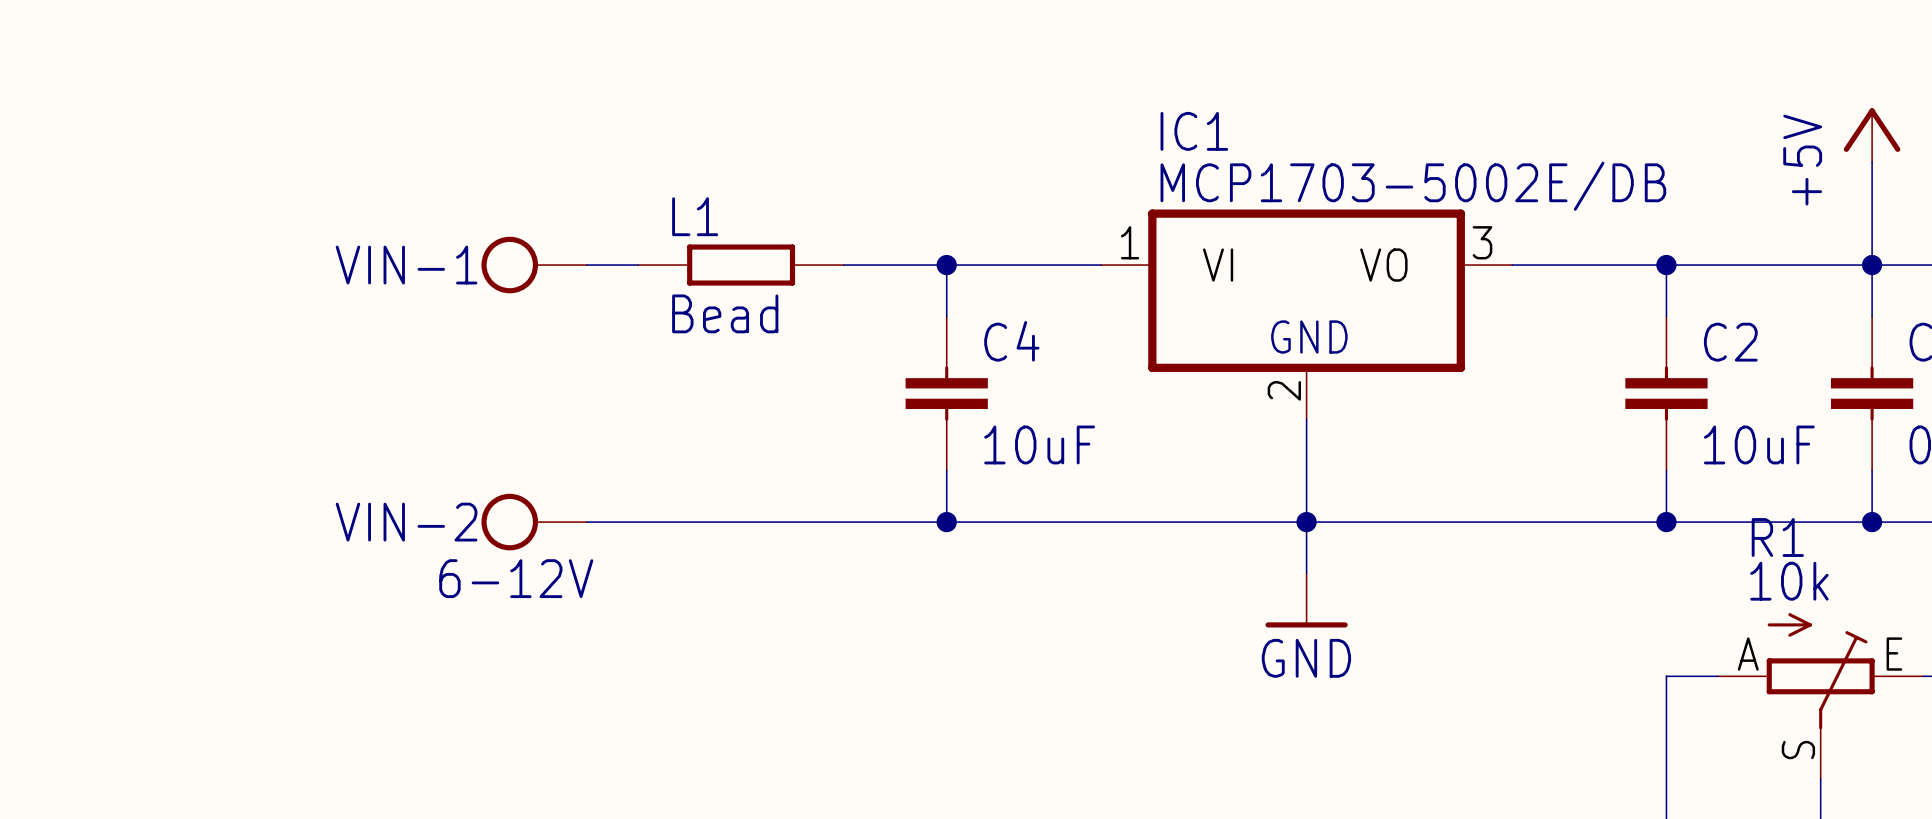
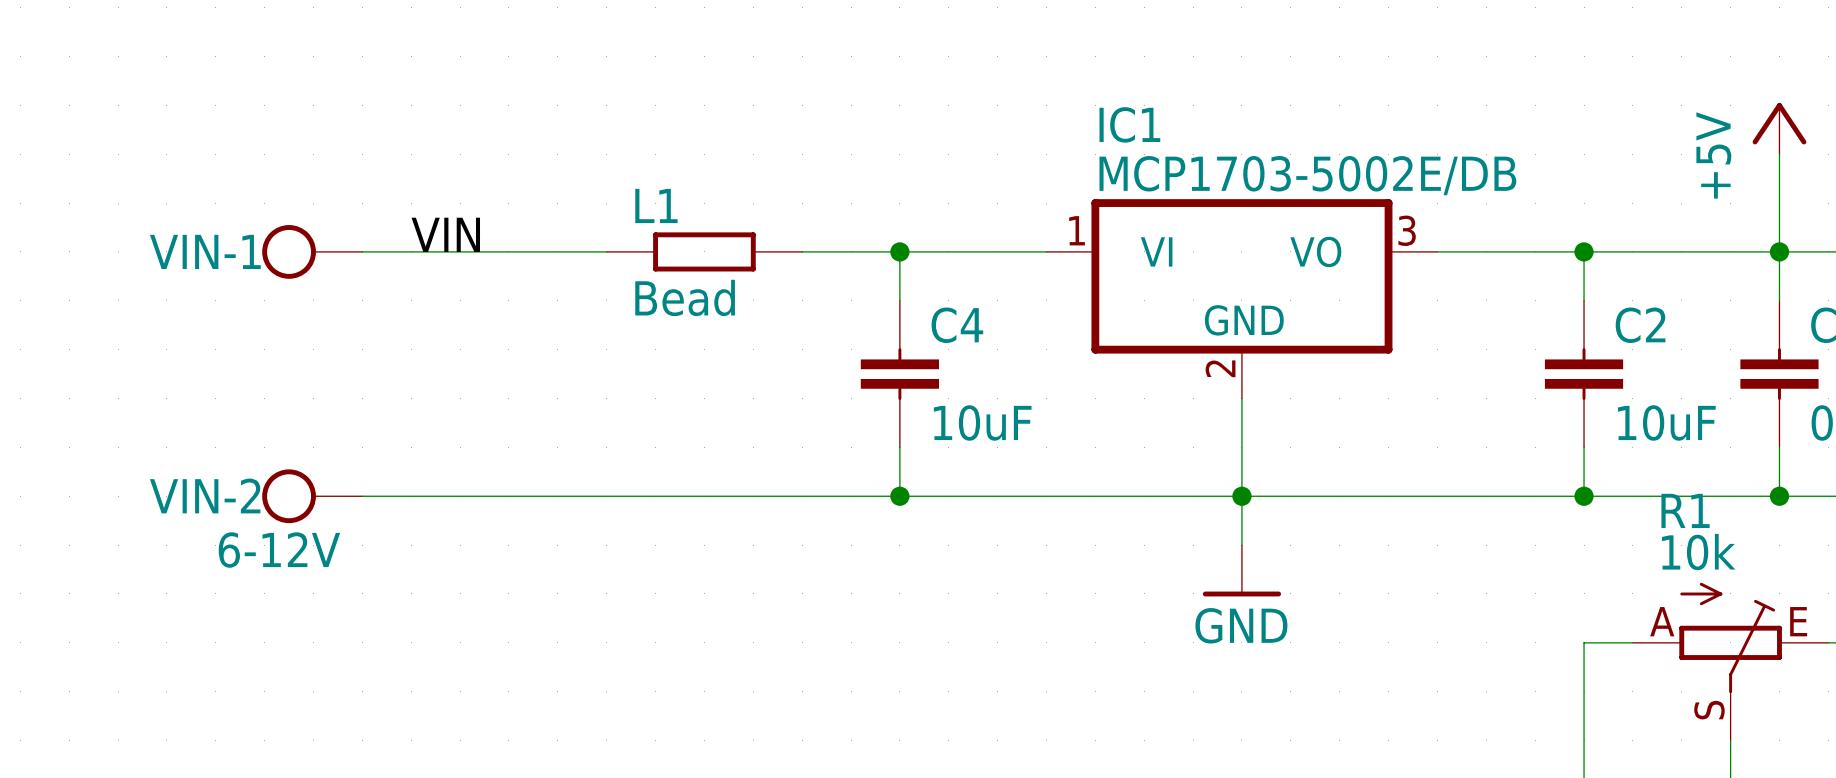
label: none -> VIN (445, 234)
wire: none -> (362, 251) (557, 251)
VIN-1 position: (534, 265) -> (312, 251)
wire: none -> (362, 496) (557, 496)
VIN-2 position: (534, 522) -> (312, 496)

